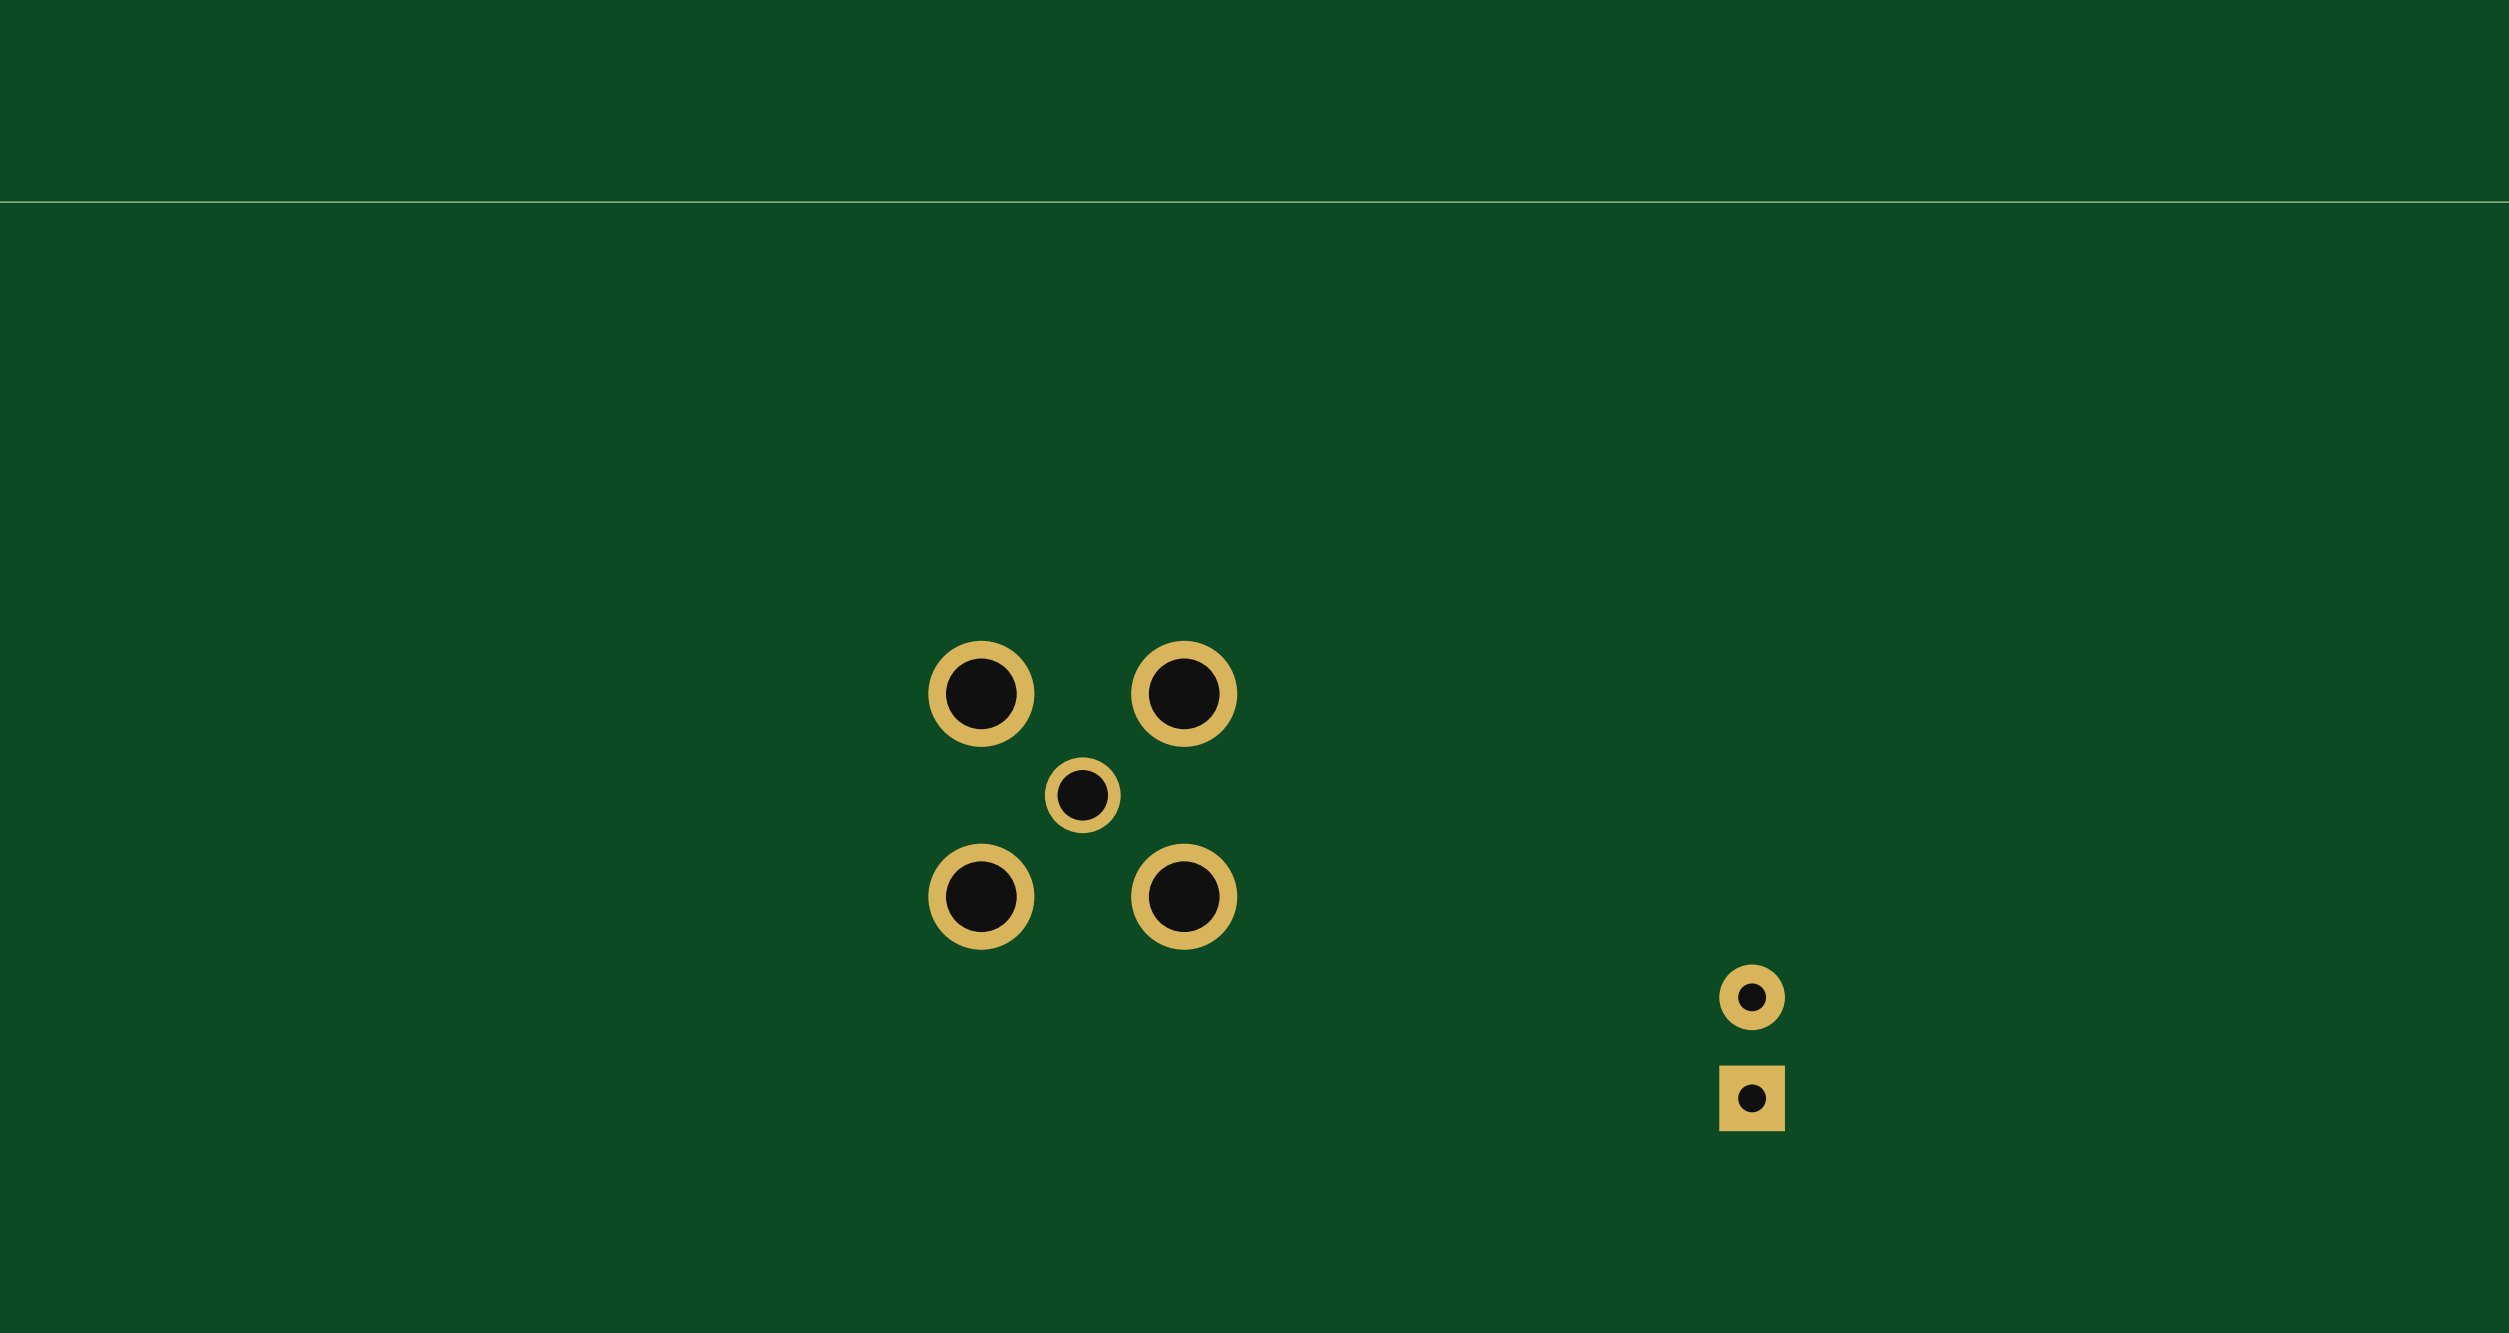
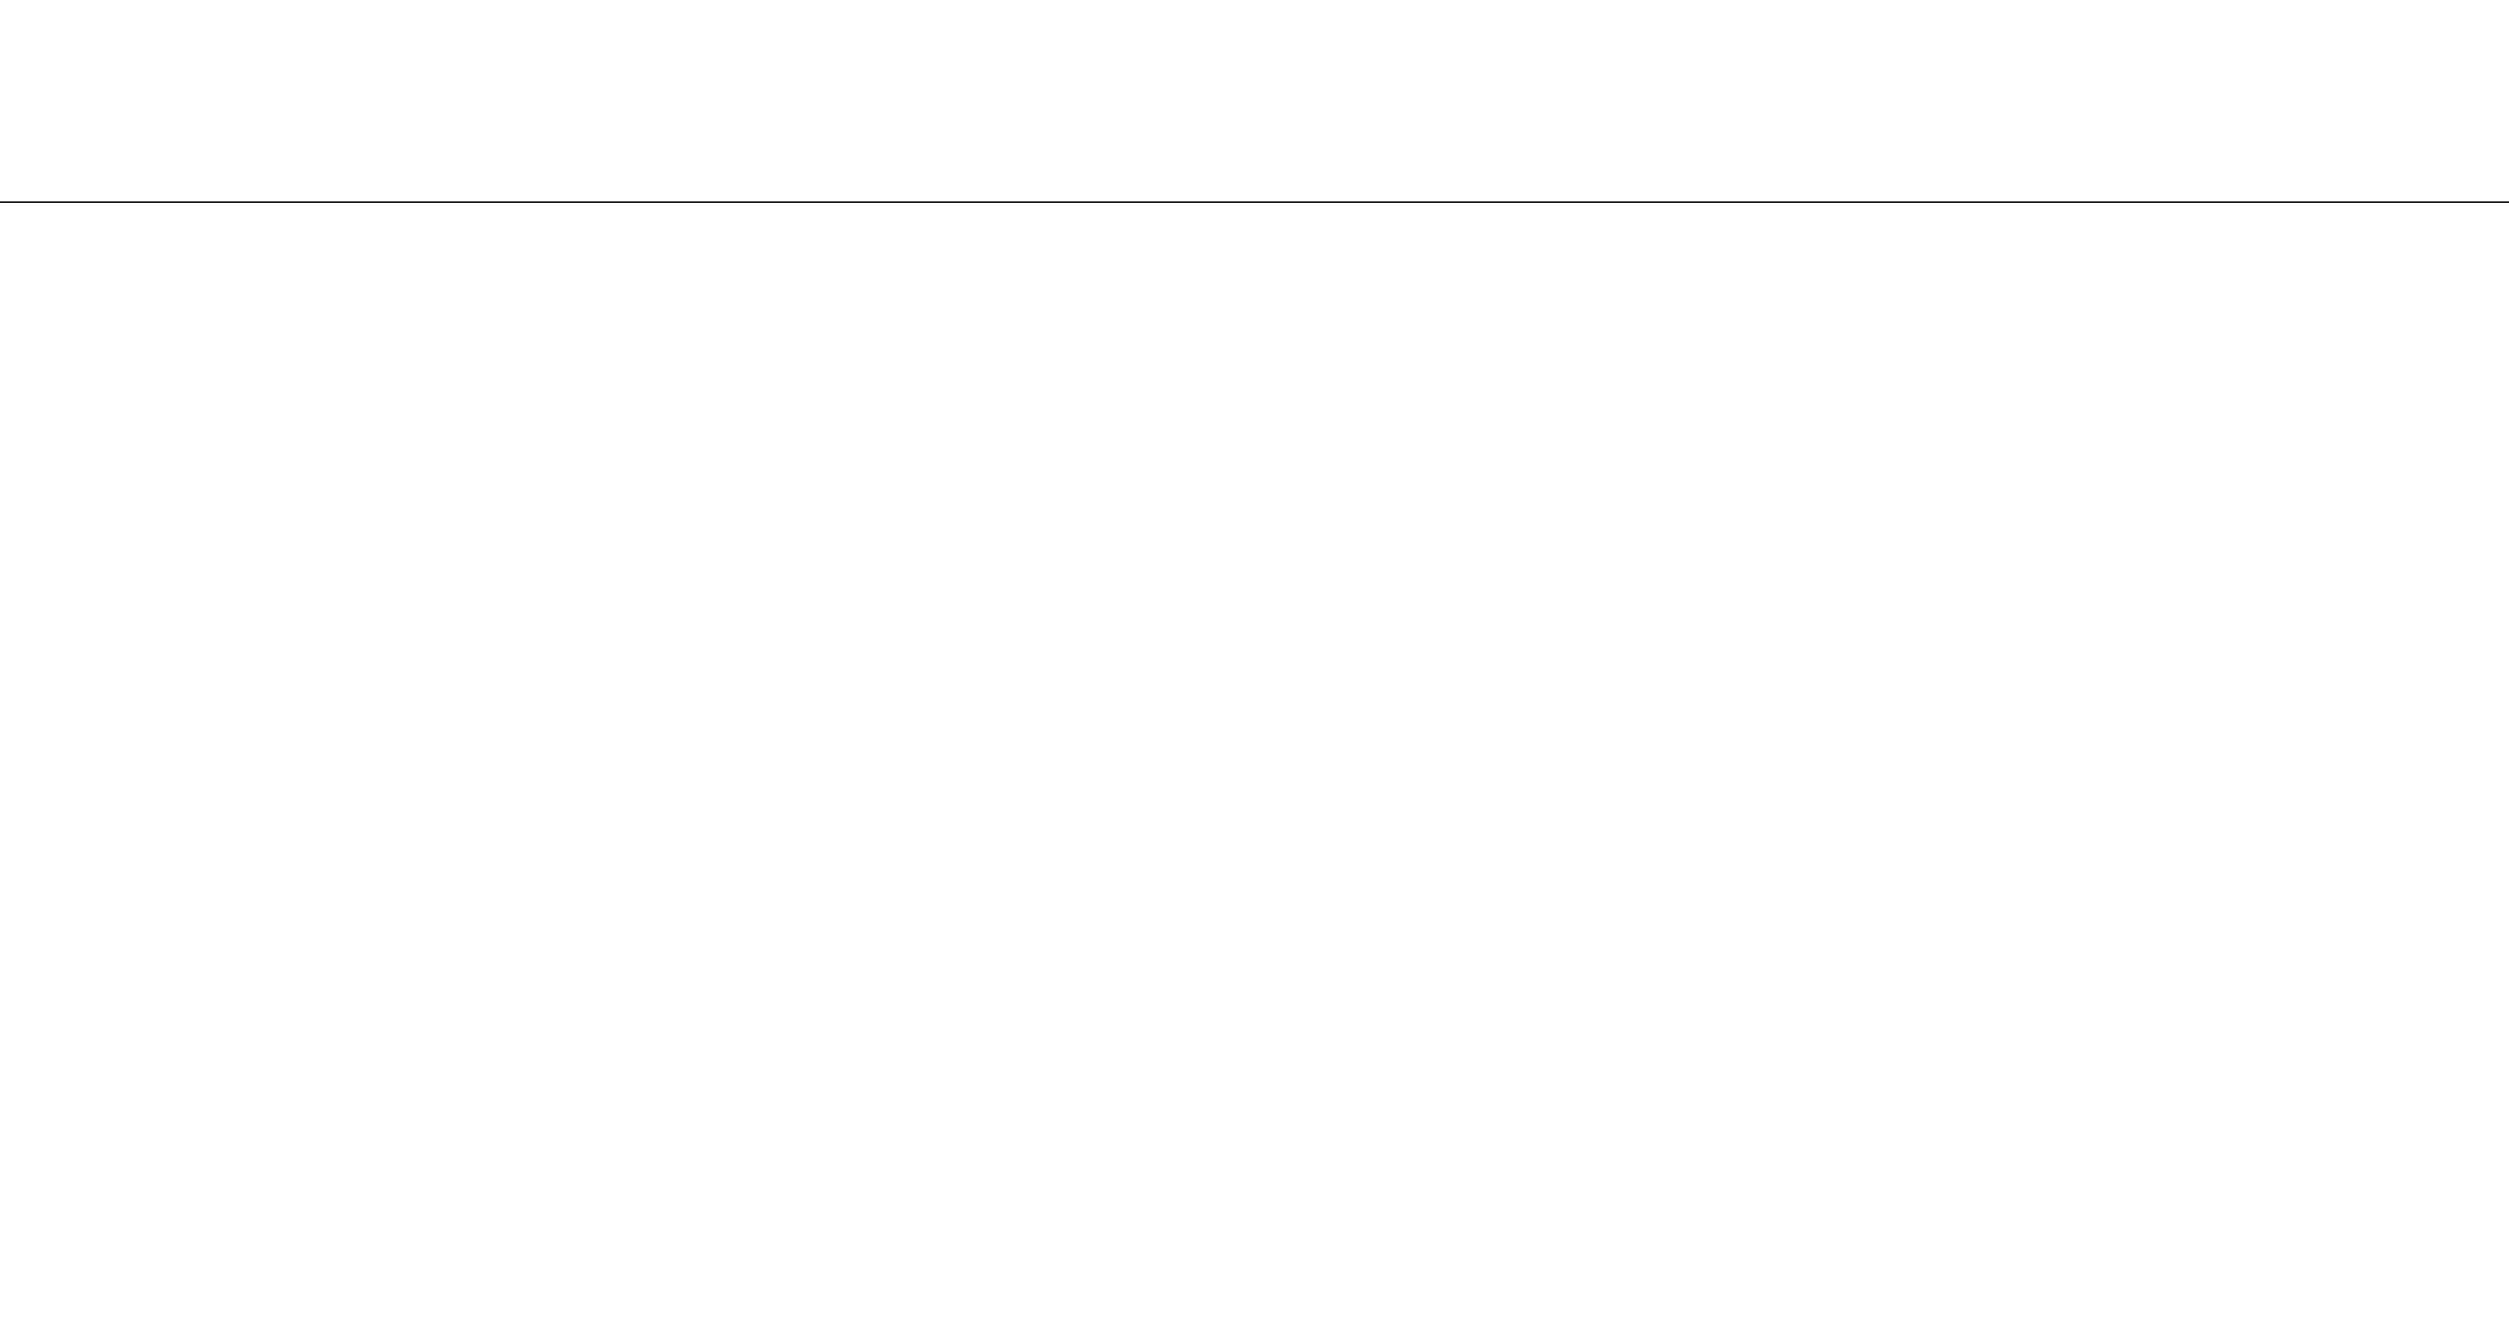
part: (1082, 795) -> none
part: (1752, 1047) -> none

